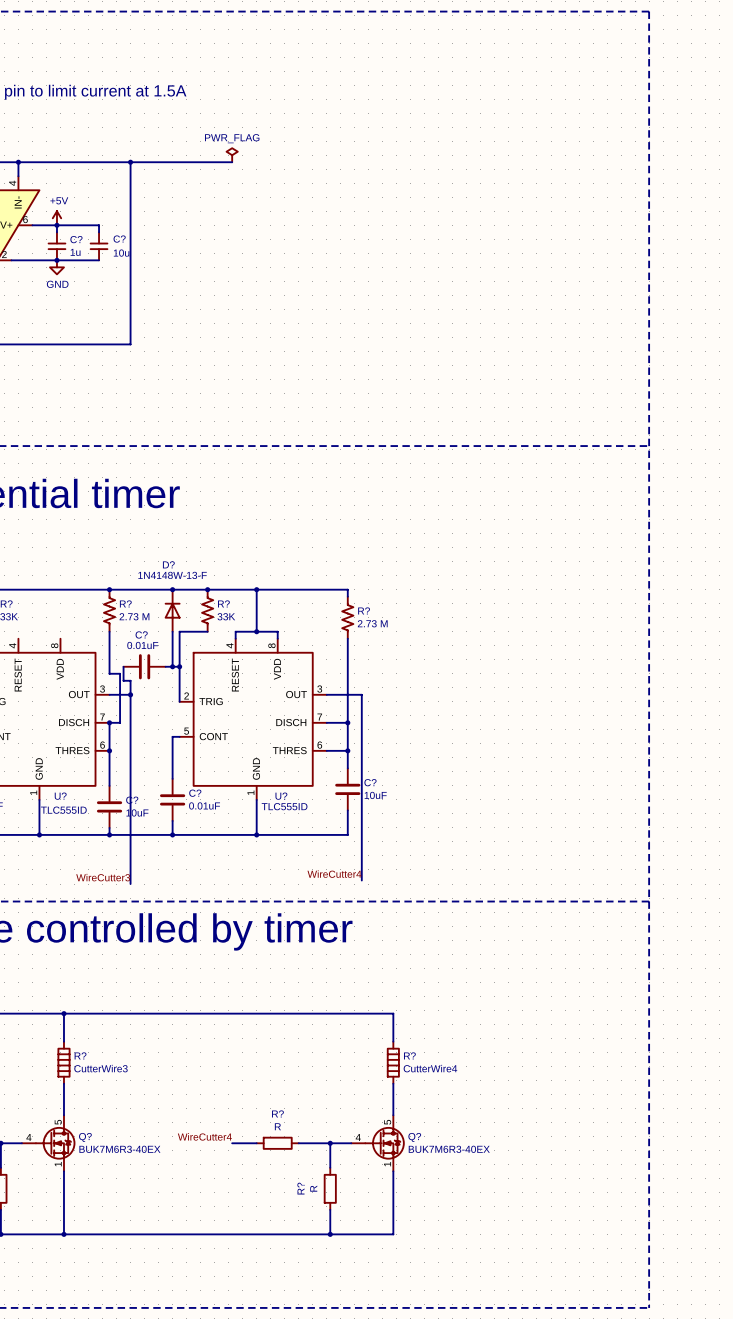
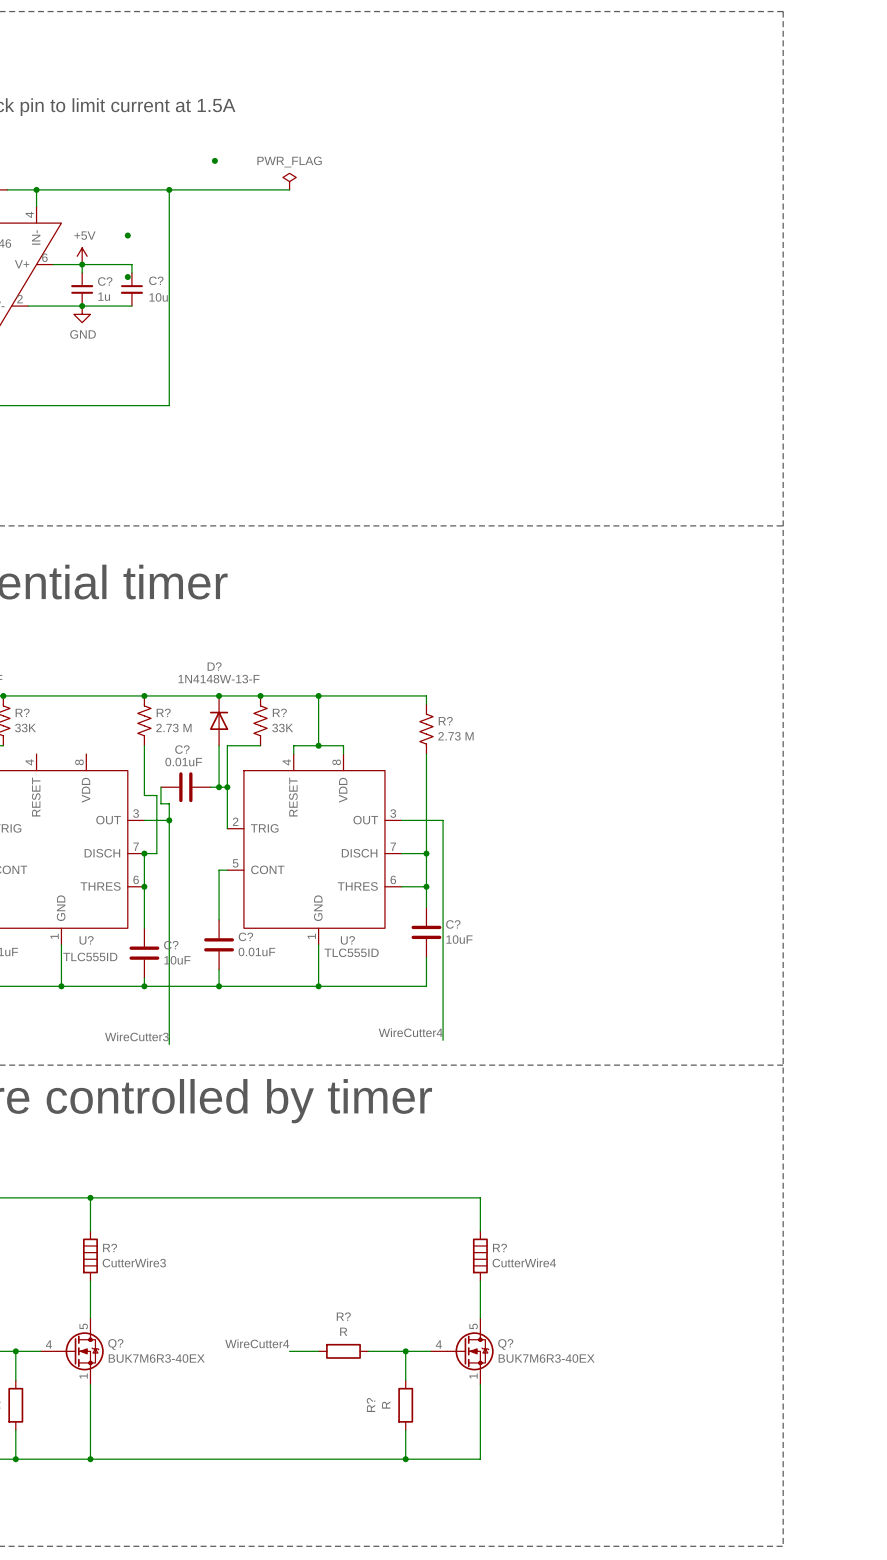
junction: none -> (214, 160)
junction: none -> (127, 235)
junction: none -> (127, 277)

